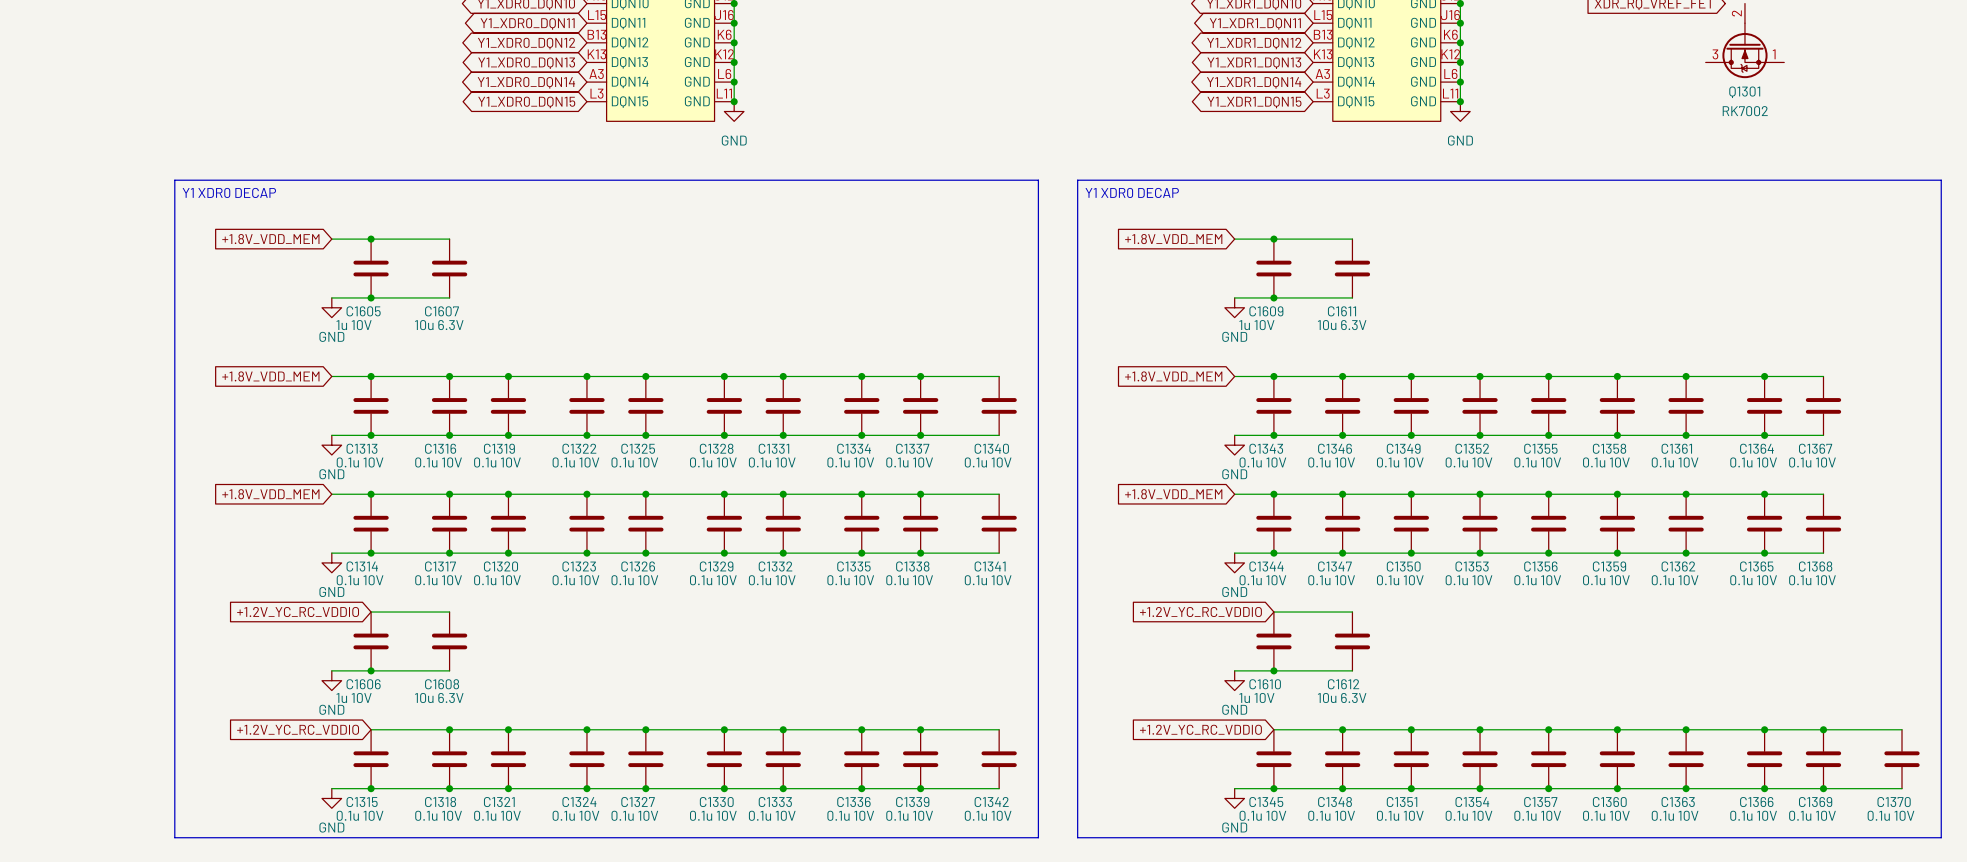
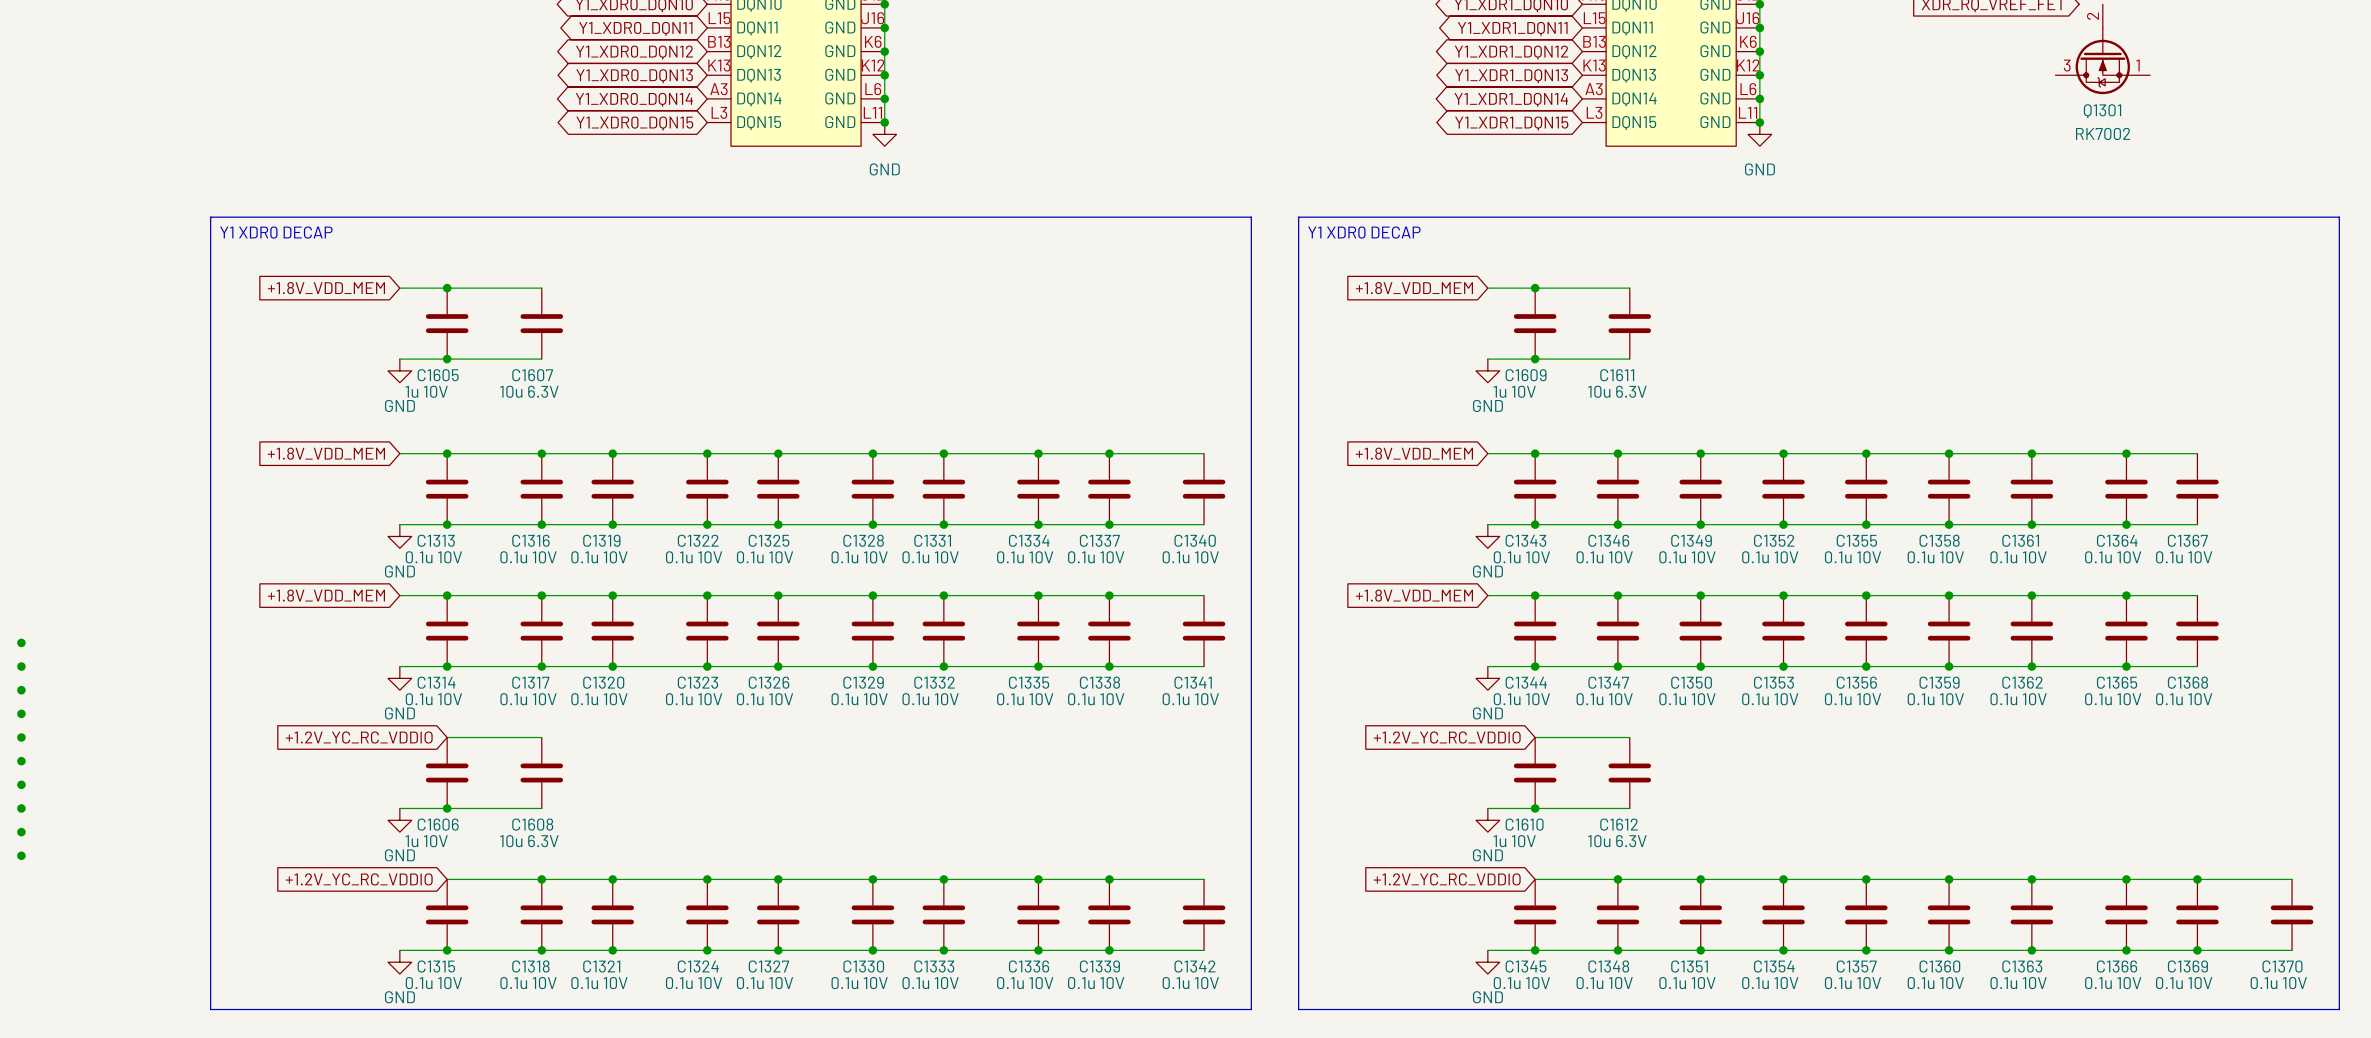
junction: none -> (21, 642)
junction: none -> (21, 666)
junction: none -> (21, 690)
junction: none -> (21, 713)
junction: none -> (21, 737)
junction: none -> (21, 761)
junction: none -> (21, 784)
junction: none -> (21, 808)
junction: none -> (21, 832)
junction: none -> (21, 855)

